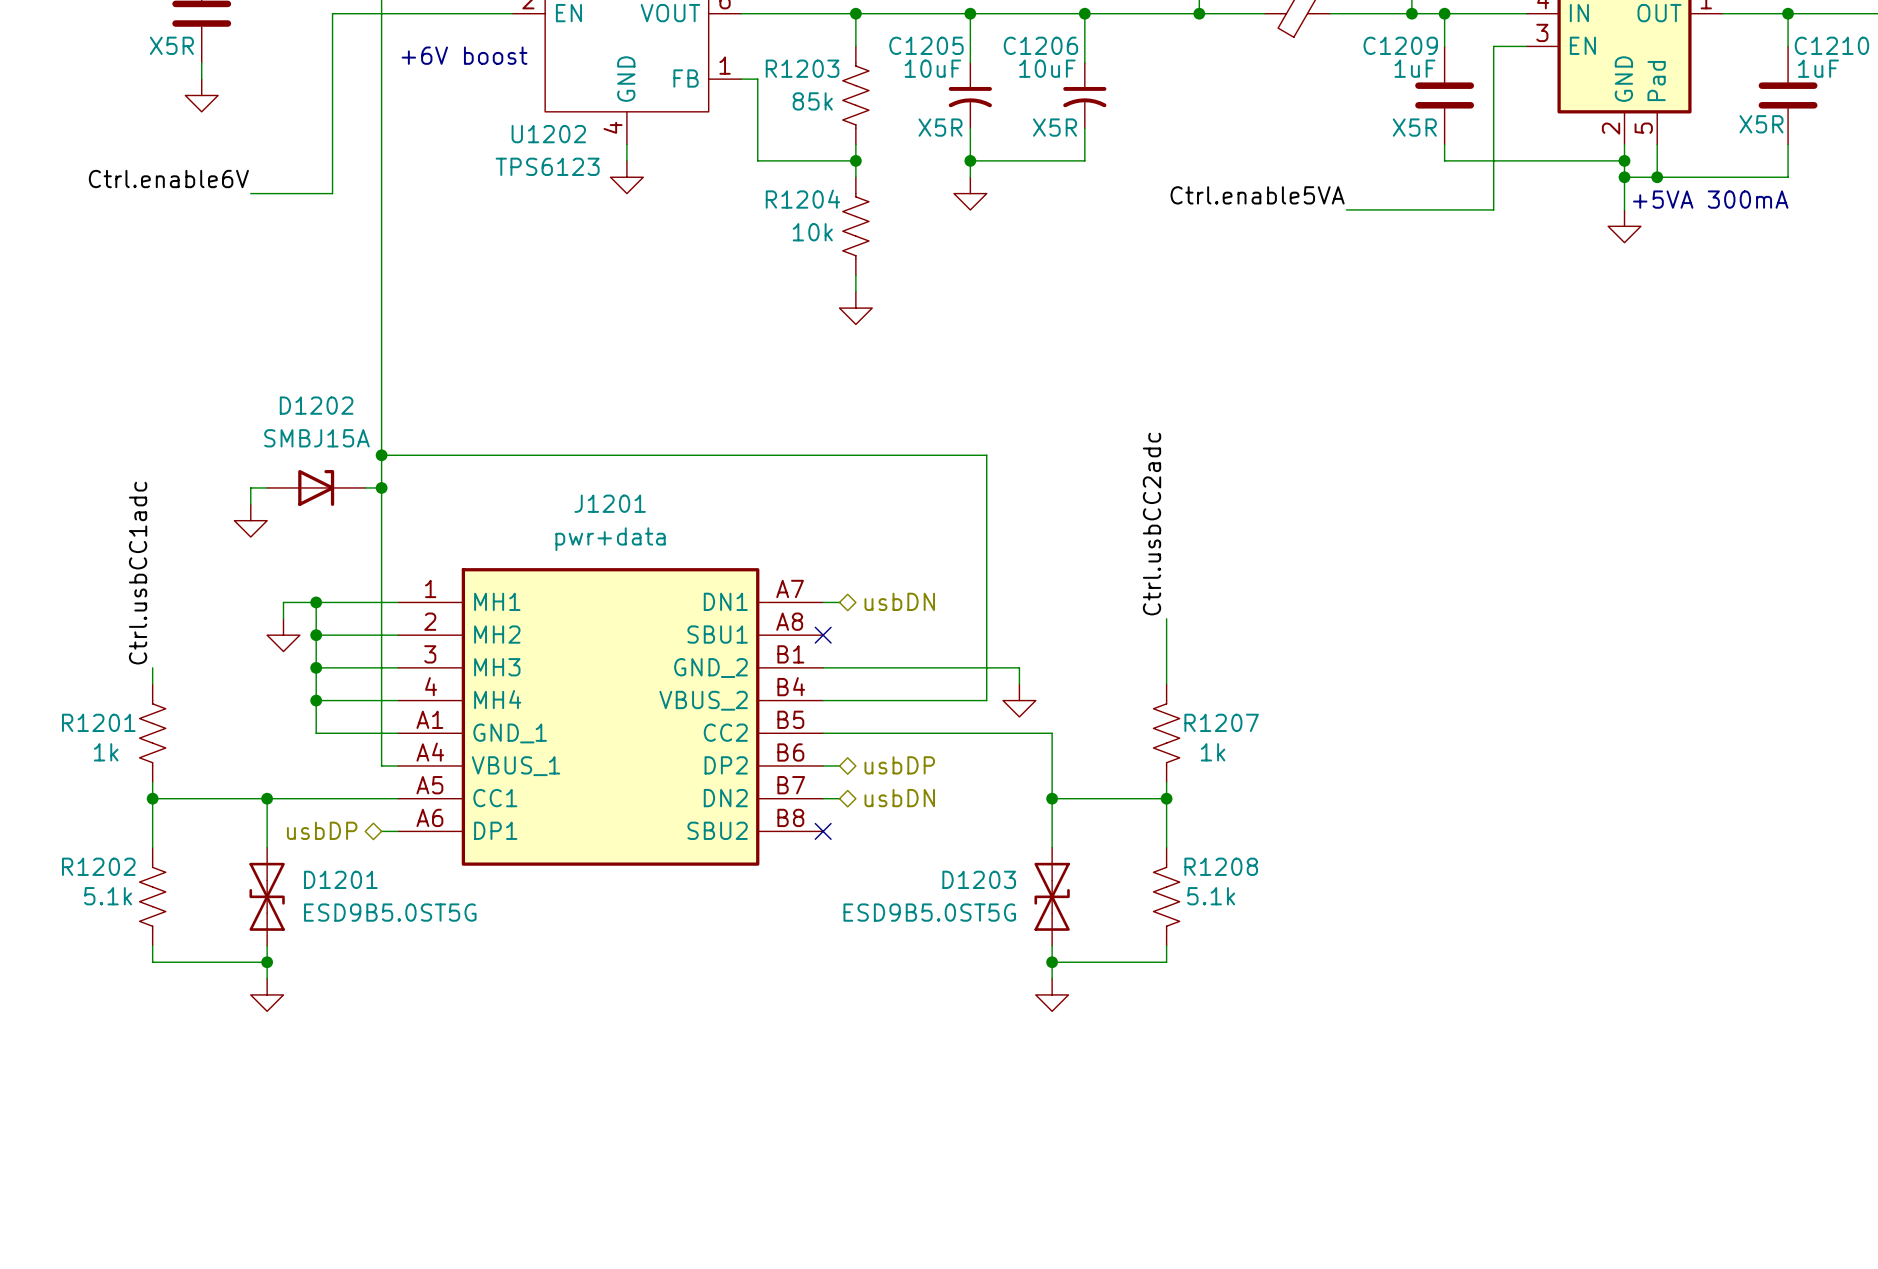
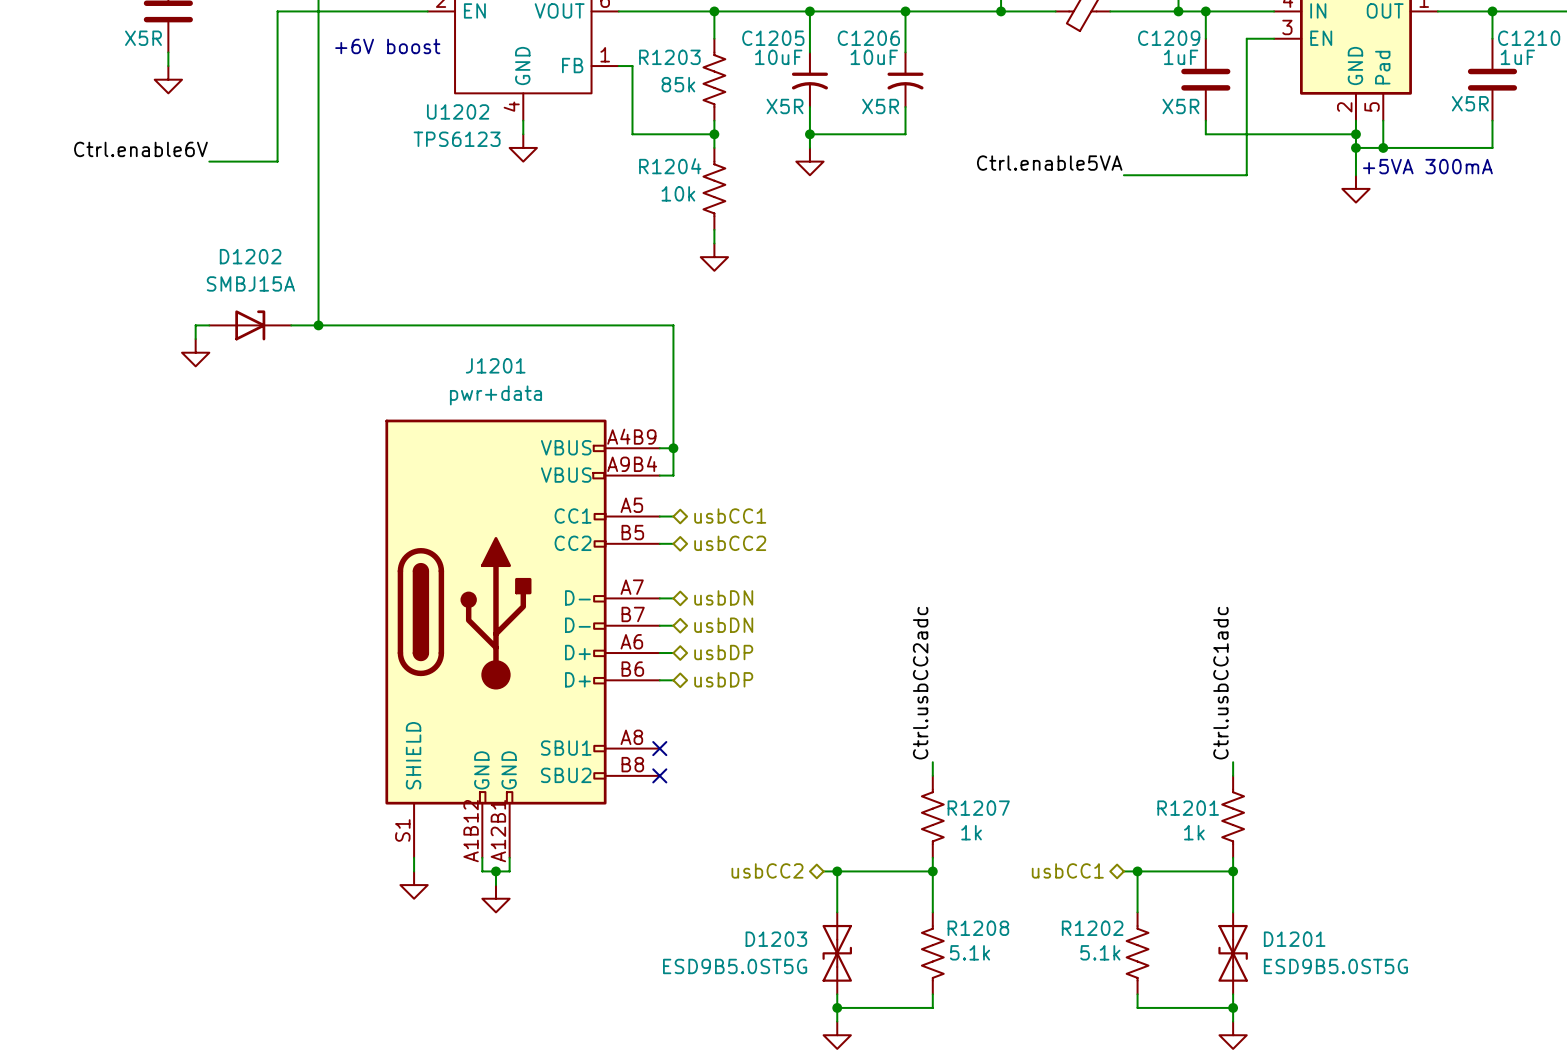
wire: none -> (291, 325) (673, 325) (673, 475) (659, 475)
wire: (381, 389) (381, 765) (397, 765) -> none
junction: none -> (318, 325)
wire: (381, 455) (986, 455) (986, 700) (823, 700) -> none
junction: (381, 455) -> none
wire: (267, 487) (250, 487) (250, 504) -> (209, 325) (195, 325) (195, 339)
D1202 position: (316, 487) -> (250, 325)
wire: (365, 487) (381, 487) -> none
junction: (381, 487) -> none
J1201 name position: J1201 (610, 503) -> J1201 (495, 365)
power symbol position: (250, 520) -> (195, 352)
label position: Ctrl.usbCC2adc (1152, 524) -> Ctrl.usbCC2adc (920, 683)
wire: none -> (659, 448) (673, 448)
junction: none -> (673, 448)
J1201 value position: pwr+data (610, 539) -> pwr+data (495, 395)
J1201 symbol: [397, 568, 824, 866] -> [385, 419, 660, 858]
label: Ctrl.usbCC1adc (138, 573) -> none
hierarchical label: usbDN (899, 601) -> none
wire: (316, 602) (316, 733) (397, 733) -> none
junction: (316, 602) -> none
wire: (397, 602) (283, 602) (283, 618) -> none
wire: (823, 602) (839, 602) -> (659, 516) (673, 516)
hierarchical label: none -> usbCC1 (730, 516)
wire: (1166, 618) (1166, 684) -> none
power symbol: (283, 635) -> none
wire: (316, 635) (397, 635) -> none
junction: (316, 635) -> none
no-connect mark: (823, 635) -> none
hierarchical label: none -> usbCC2 (730, 543)
wire: none -> (659, 543) (673, 543)
wire: (152, 667) (152, 684) -> none
wire: (316, 667) (397, 667) -> none
junction: (316, 667) -> none
wire: (823, 667) (1019, 667) (1019, 684) -> none
wire: (316, 700) (397, 700) -> none
junction: (316, 700) -> none
power symbol: (1019, 700) -> none
wire: none -> (659, 598) (673, 598)
hierarchical label: none -> usbDN (723, 597)
R1201 position: (152, 733) -> (1233, 816)
wire: (823, 733) (1052, 733) (1052, 847) -> none
R1207 position: (1166, 733) -> (932, 816)
wire: none -> (659, 625) (673, 625)
hierarchical label: none -> usbDN (723, 625)
wire: (823, 765) (839, 765) -> (659, 653) (673, 653)
hierarchical label: usbDP (899, 765) -> none
hierarchical label: none -> usbDP (723, 652)
wire: (152, 782) (152, 847) -> none
wire: (1166, 782) (1166, 847) -> (932, 857) (932, 912)
wire: (152, 798) (397, 798) -> none
junction: (152, 798) -> none
wire: (267, 798) (267, 847) -> none
junction: (267, 798) -> none
wire: (823, 798) (839, 798) -> (659, 680) (673, 680)
hierarchical label: usbDN (899, 798) -> none
wire: (1052, 798) (1166, 798) -> none
junction: (1052, 798) -> none
junction: (1166, 798) -> none
hierarchical label: none -> usbDP (723, 679)
label: none -> Ctrl.usbCC1adc (1220, 683)
hierarchical label: usbDP (322, 830) -> none
wire: (381, 831) (397, 831) -> none
no-connect mark: (823, 831) -> none
R1202 position: (152, 896) -> (1137, 953)
D1201 position: (267, 896) -> (1233, 953)
no-connect mark: none -> (659, 748)
D1203 position: (1052, 896) -> (837, 953)
R1208 position: (1166, 896) -> (932, 953)
wire: none -> (932, 762) (932, 775)
wire: none -> (1233, 762) (1233, 775)
no-connect mark: none -> (659, 775)
wire: (152, 945) (152, 962) (267, 962) -> none
wire: (267, 945) (267, 978) -> none
wire: (1052, 945) (1052, 978) -> (837, 994) (837, 1021)
wire: (1166, 945) (1166, 962) (1052, 962) -> (932, 994) (932, 1007) (837, 1007)
junction: (267, 962) -> none
junction: (1052, 962) -> none
power symbol: (267, 994) -> none
power symbol: (1052, 994) -> none
wire: none -> (414, 857) (414, 871)
wire: none -> (482, 857) (482, 871) (509, 871) (509, 857)
wire: none -> (1233, 857) (1233, 912)
hierarchical label: none -> usbCC2 (767, 870)
hierarchical label: none -> usbCC1 (1067, 870)
wire: none -> (495, 871) (495, 885)
junction: none -> (495, 871)
wire: none -> (823, 871) (932, 871)
wire: none -> (837, 871) (837, 912)
junction: none -> (837, 871)
junction: none -> (932, 871)
wire: none -> (1123, 871) (1233, 871)
wire: none -> (1137, 871) (1137, 912)
junction: none -> (1137, 871)
junction: none -> (1233, 871)
power symbol: none -> (414, 885)
power symbol: none -> (495, 898)
wire: none -> (1137, 994) (1137, 1007) (1233, 1007)
wire: none -> (1233, 994) (1233, 1021)
junction: none -> (837, 1007)
junction: none -> (1233, 1007)
power symbol: none -> (837, 1035)
power symbol: none -> (1233, 1035)

